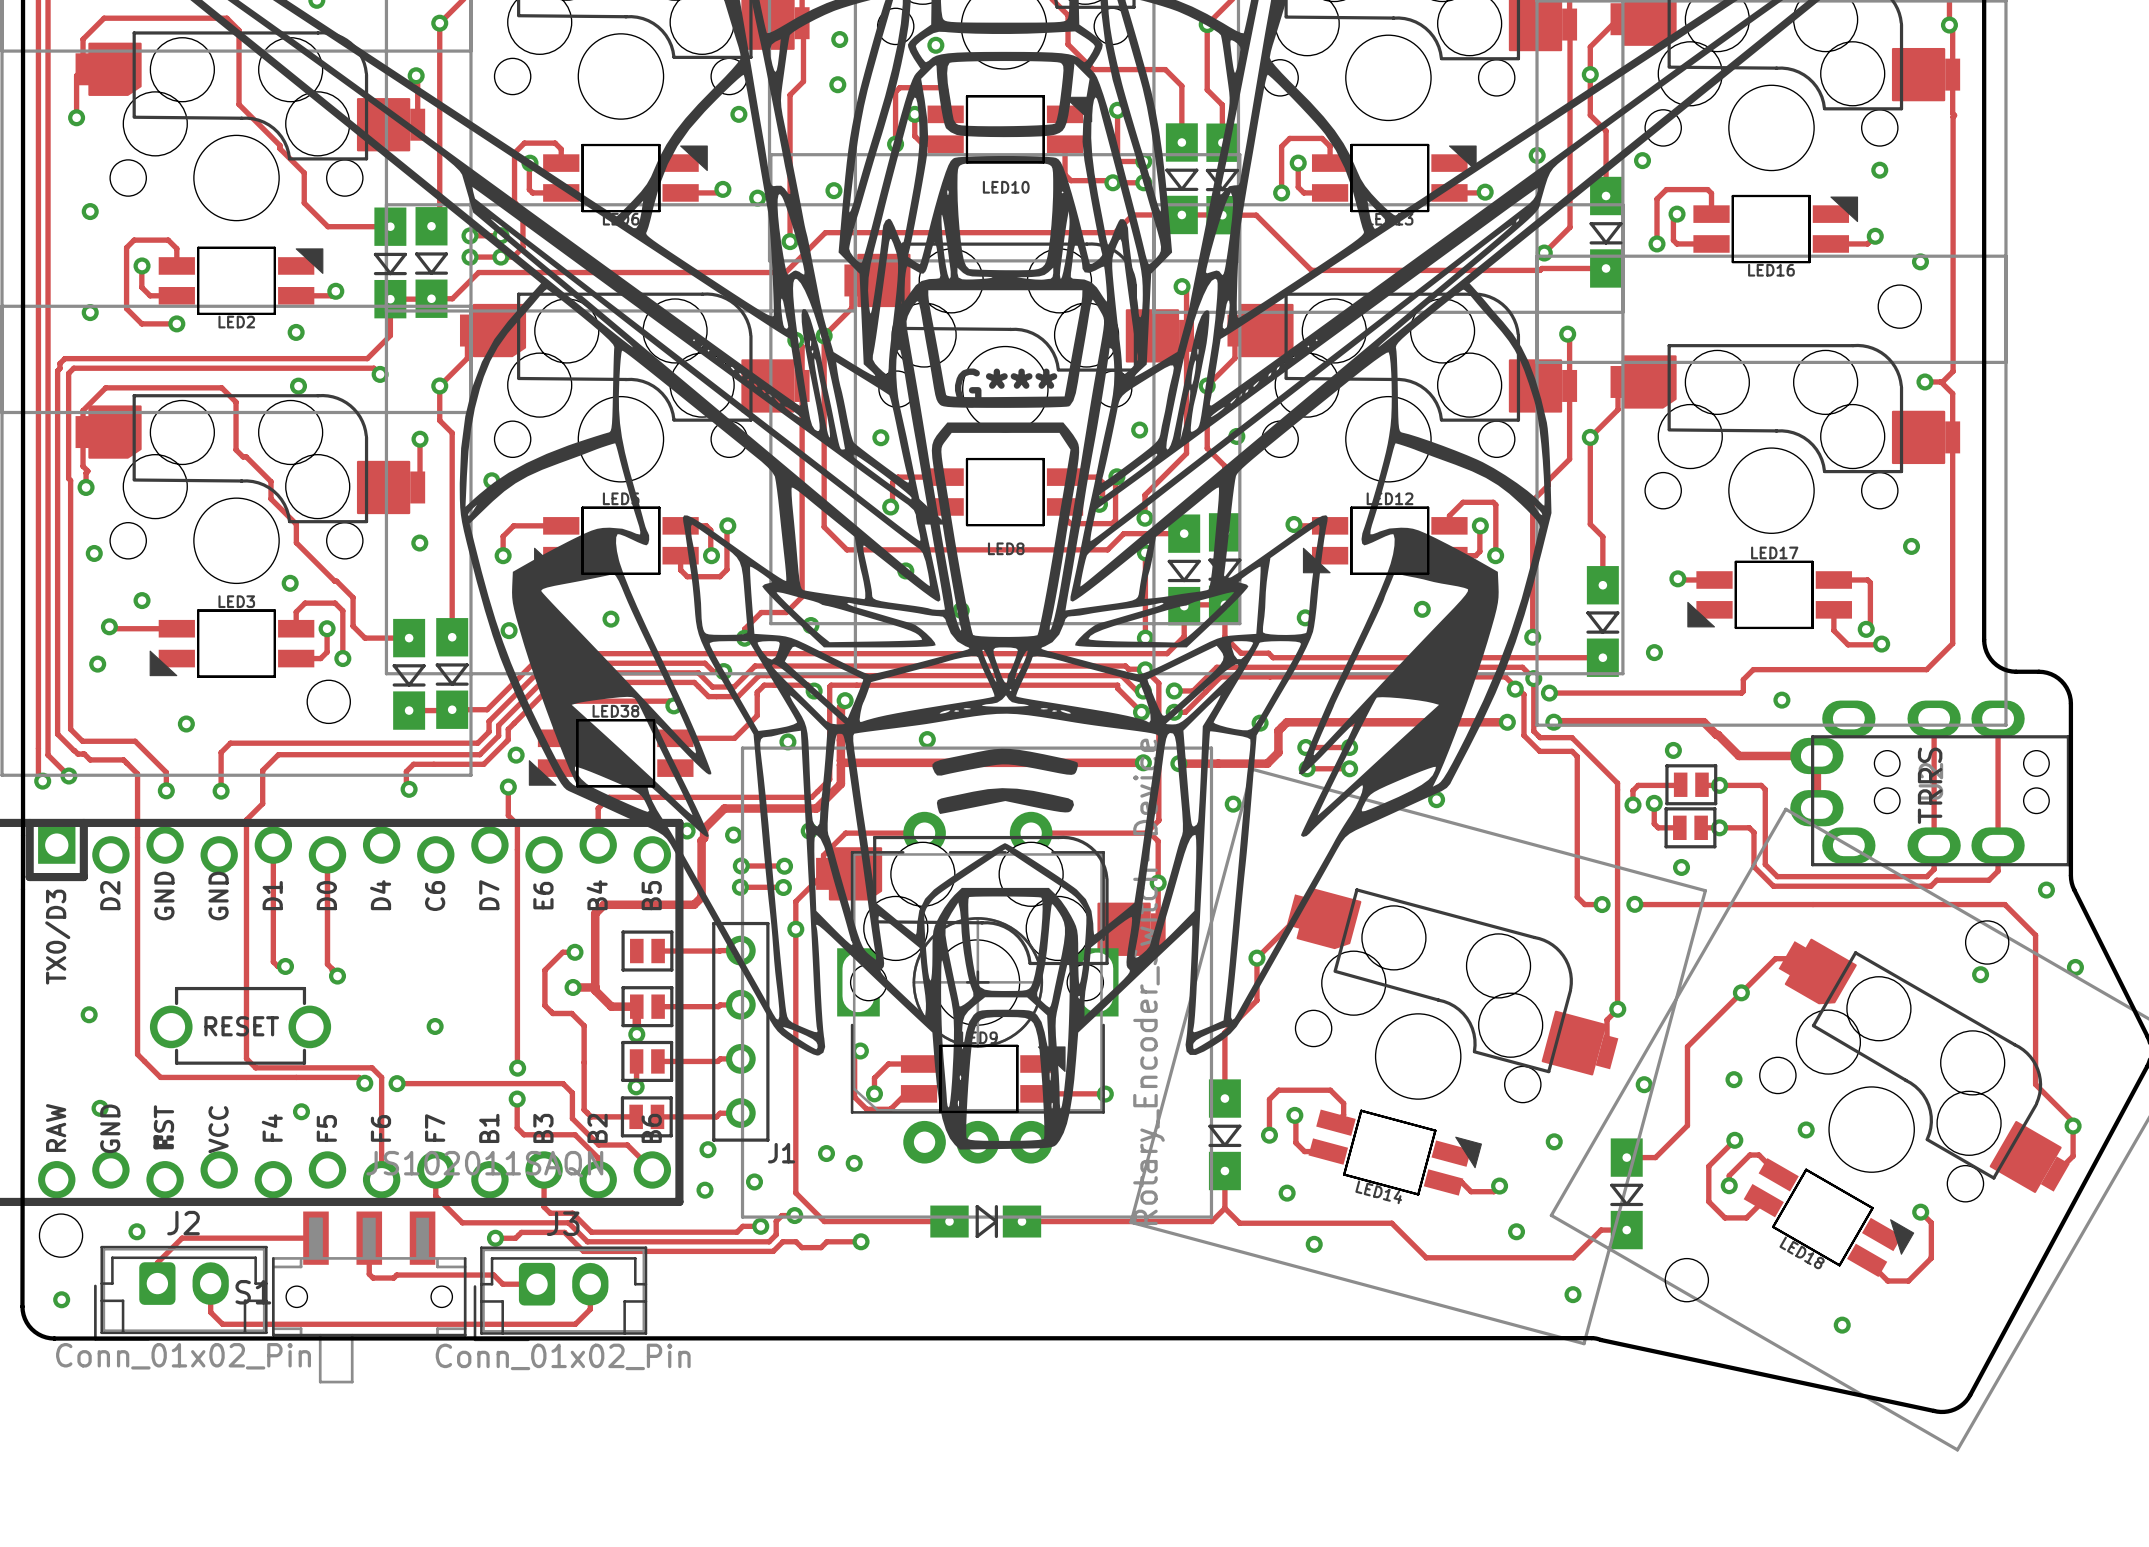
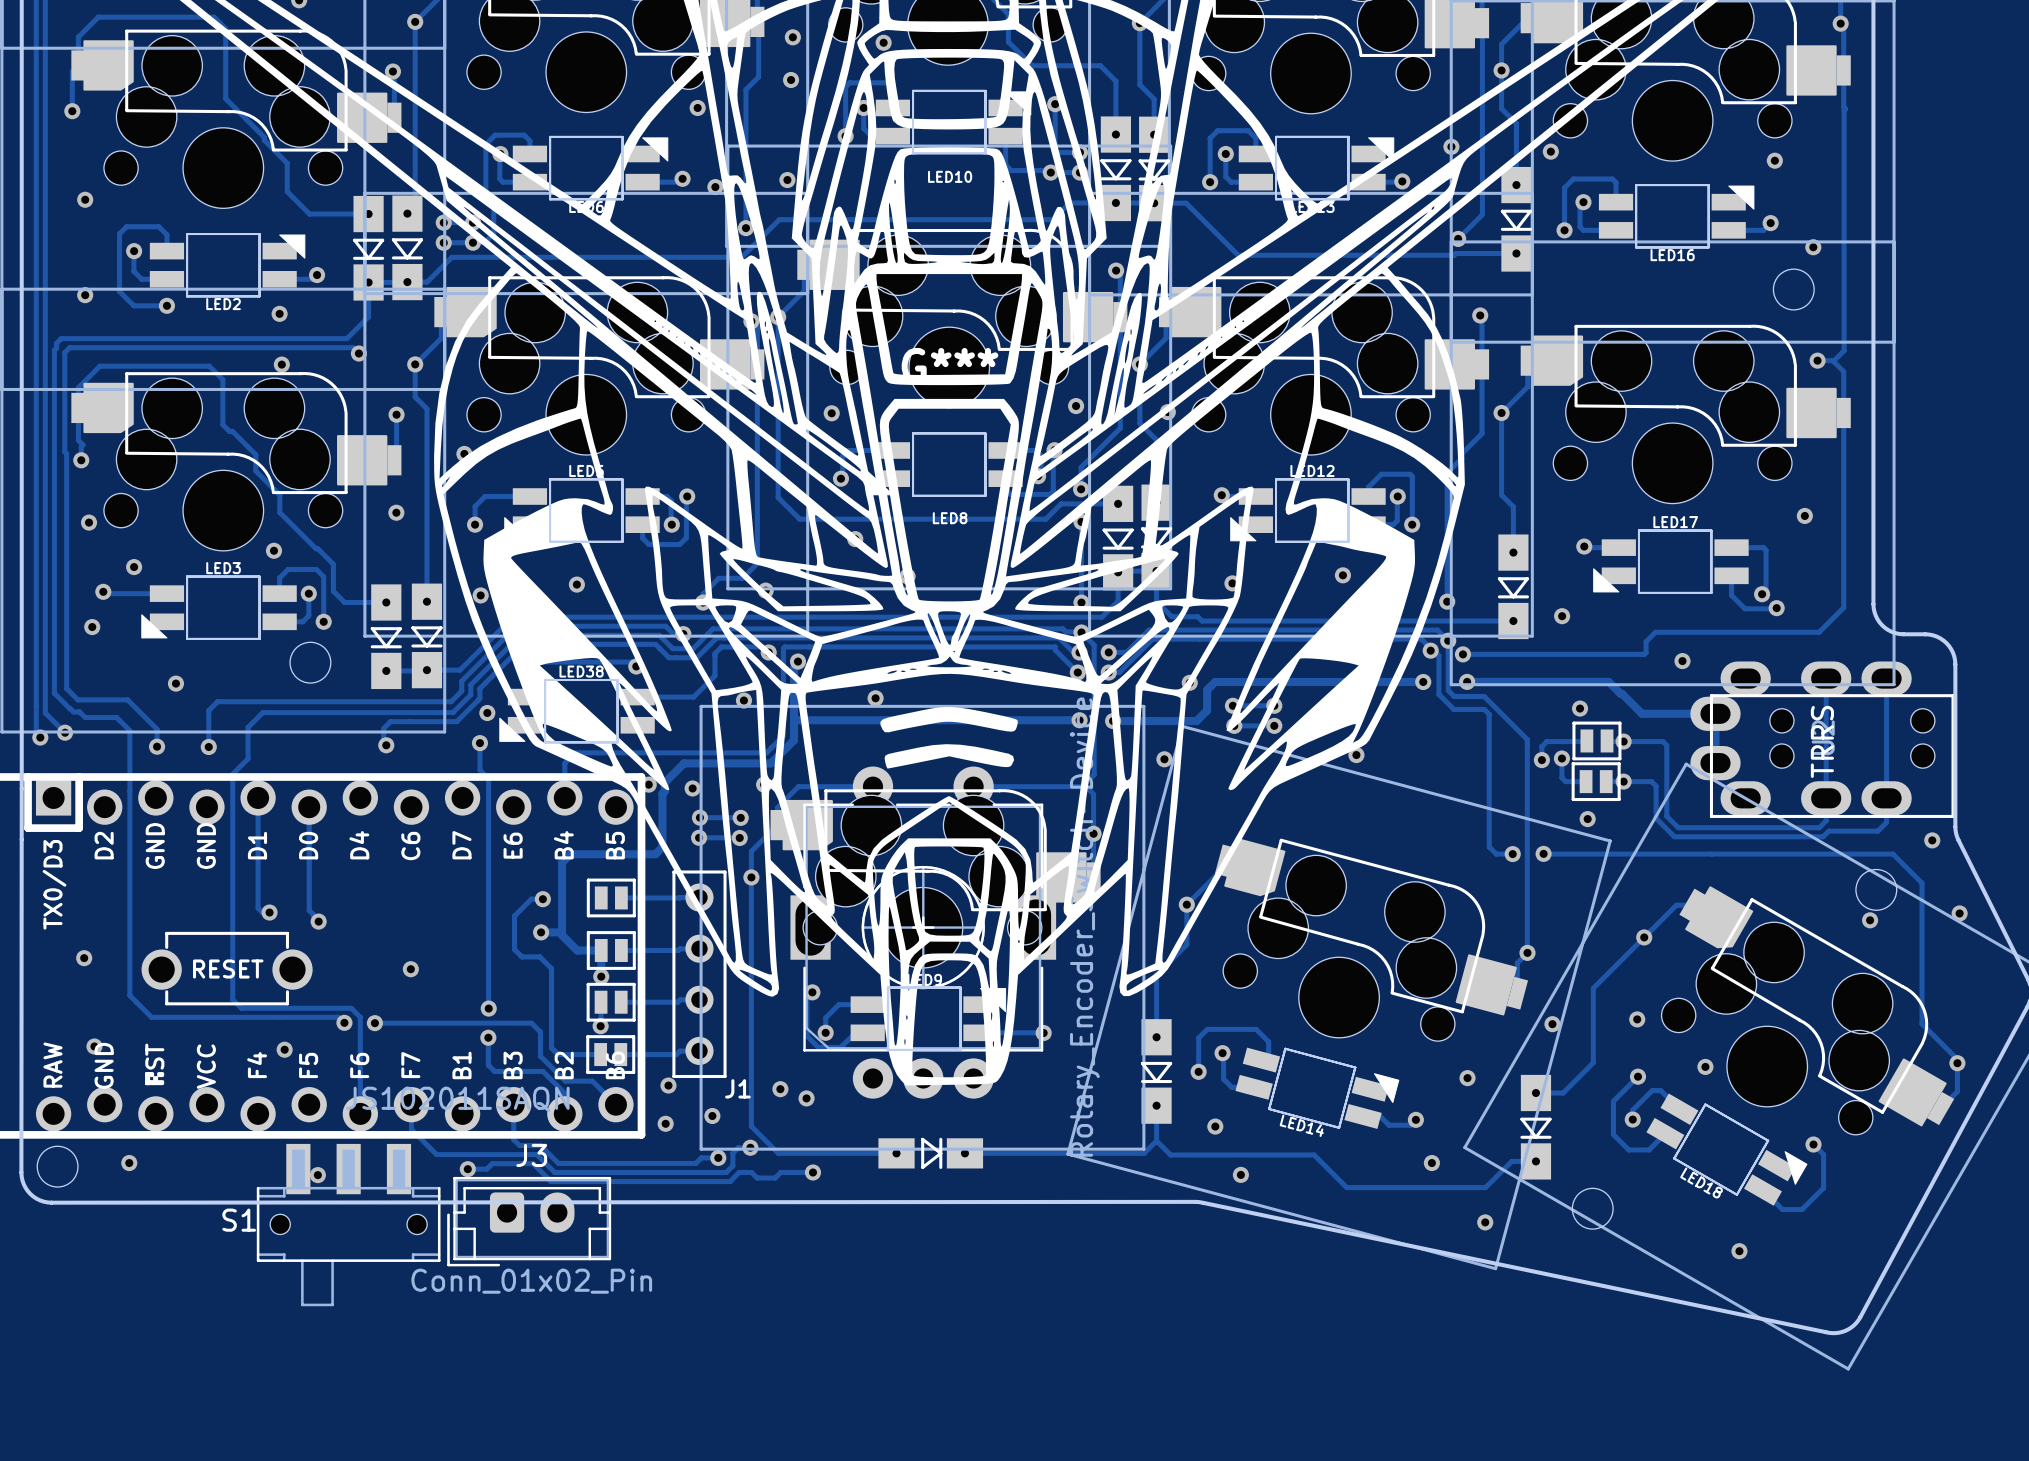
board edge: (22, 889) (22, 1306) (24, 1318) (29, 1326) (34, 1331) (46, 1337) (1591, 1338) (1933, 1410) -> (21, 839) (21, 1172) (23, 1184) (27, 1190) (33, 1196) (43, 1201) (1199, 1202) (1825, 1332)
track: (315, 1238) (182, 1238) (157, 1262) (157, 1283) -> none
track: (369, 1238) (369, 1274) (373, 1278) (393, 1278) (396, 1275) (493, 1275) (502, 1284) (537, 1284) -> none
via: none -> (317, 1175)
track: (210, 1283) (210, 1312) (222, 1324) (575, 1324) (590, 1309) (590, 1284) -> none
J2: Conn_01x02_Pin (180, 1293) -> none
via: (61, 1299) -> none

